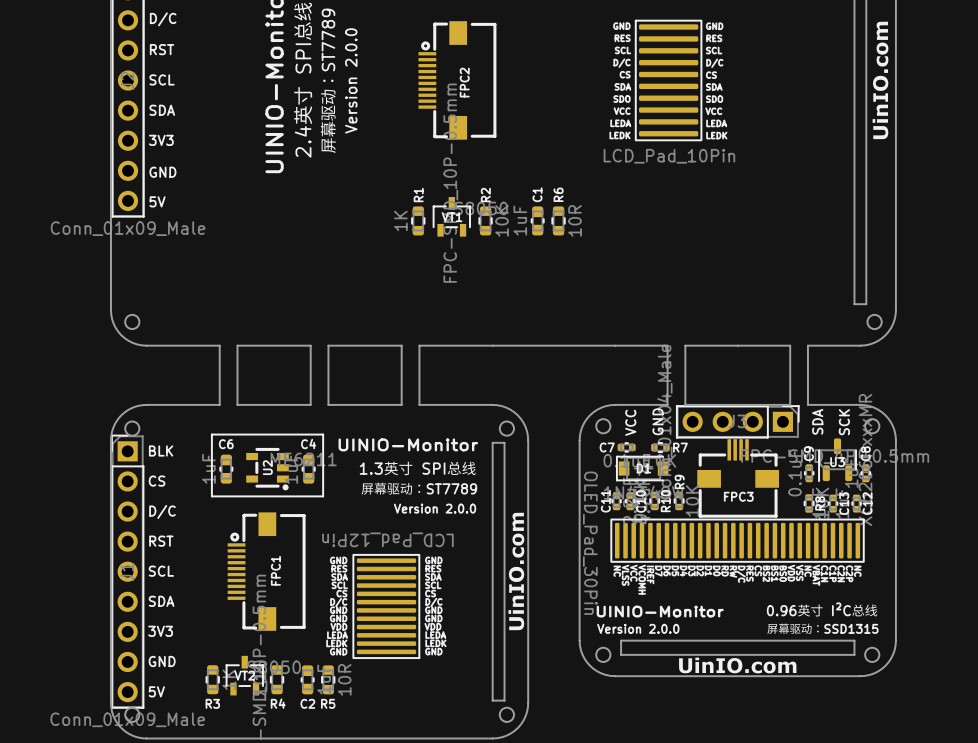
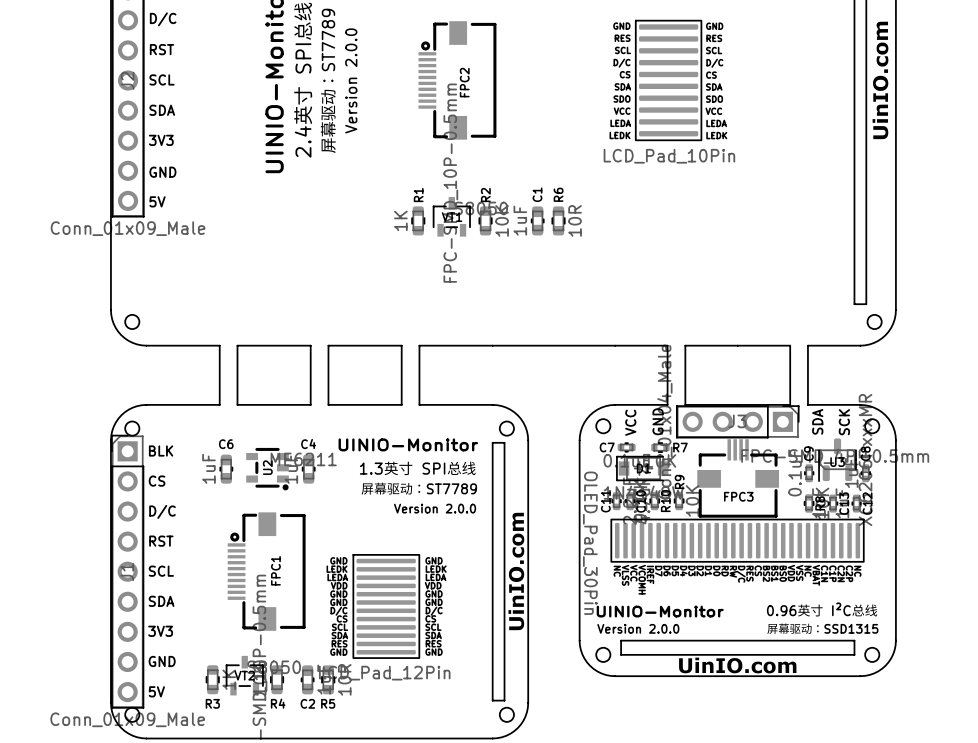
line: (211, 434) (323, 434) (323, 496) (211, 496) (211, 434) -> none
part rotation: 0° (386, 606) -> 180° (386, 606)

